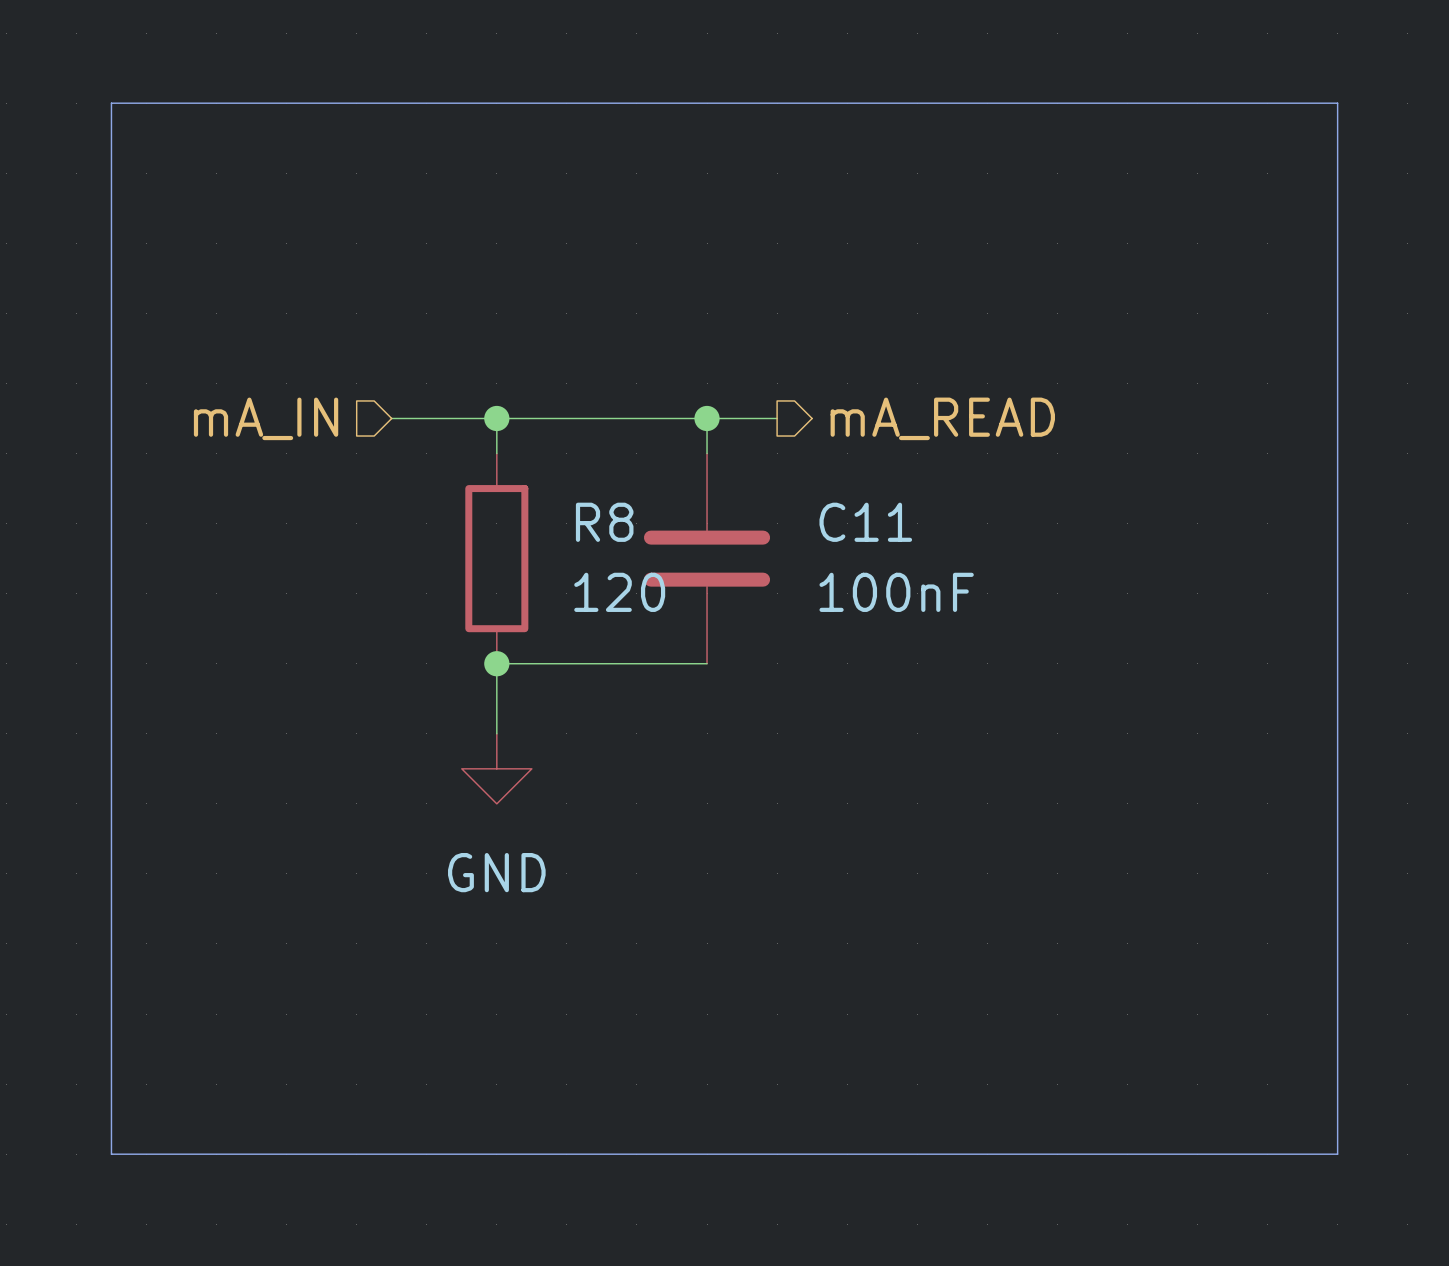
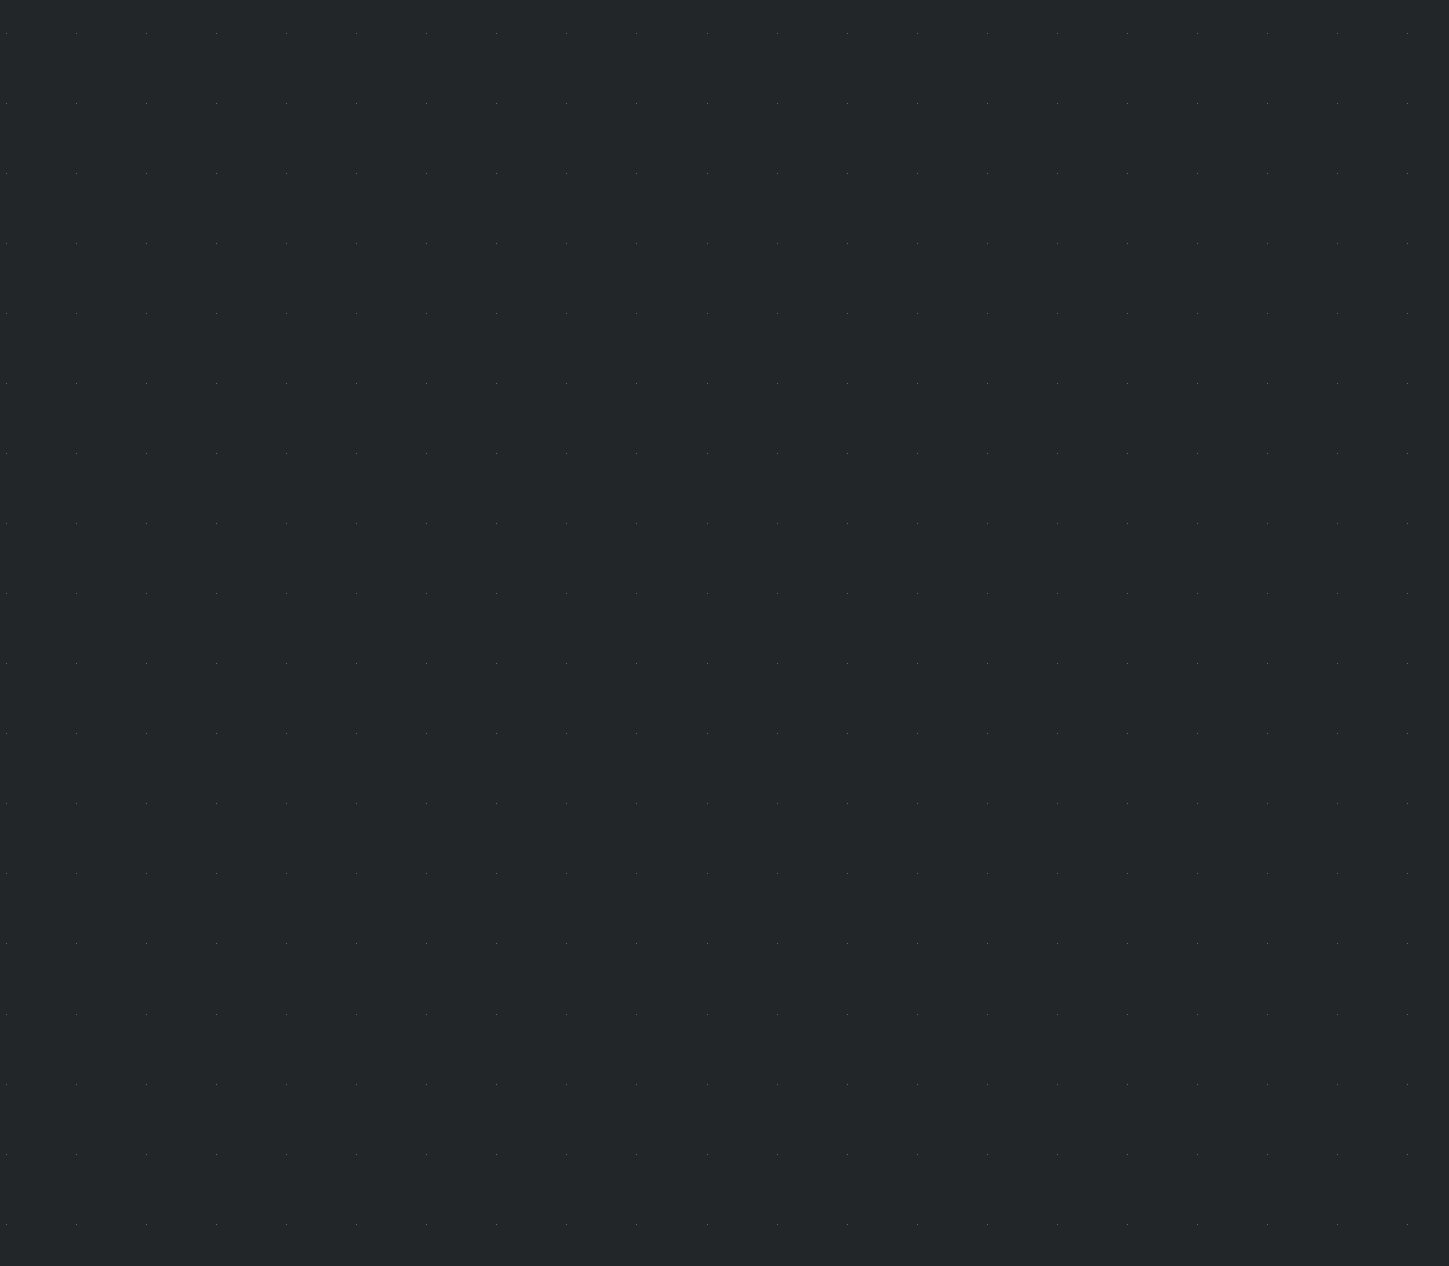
line: (111, 103) (1337, 103) (1337, 1154) (111, 1154) (111, 103) -> none
hierarchical label: mA_IN (266, 418) -> none
wire: (391, 418) (777, 418) -> none
wire: (496, 418) (496, 453) -> none
junction: (496, 418) -> none
wire: (707, 418) (707, 453) -> none
junction: (707, 418) -> none
hierarchical label: mA_READ (942, 418) -> none
R8: 120 (496, 558) -> none
C11: 100nF (707, 558) -> none
junction: (496, 663) -> none
wire: (707, 663) (496, 663) (496, 733) -> none
power symbol: GND (496, 768) -> none

